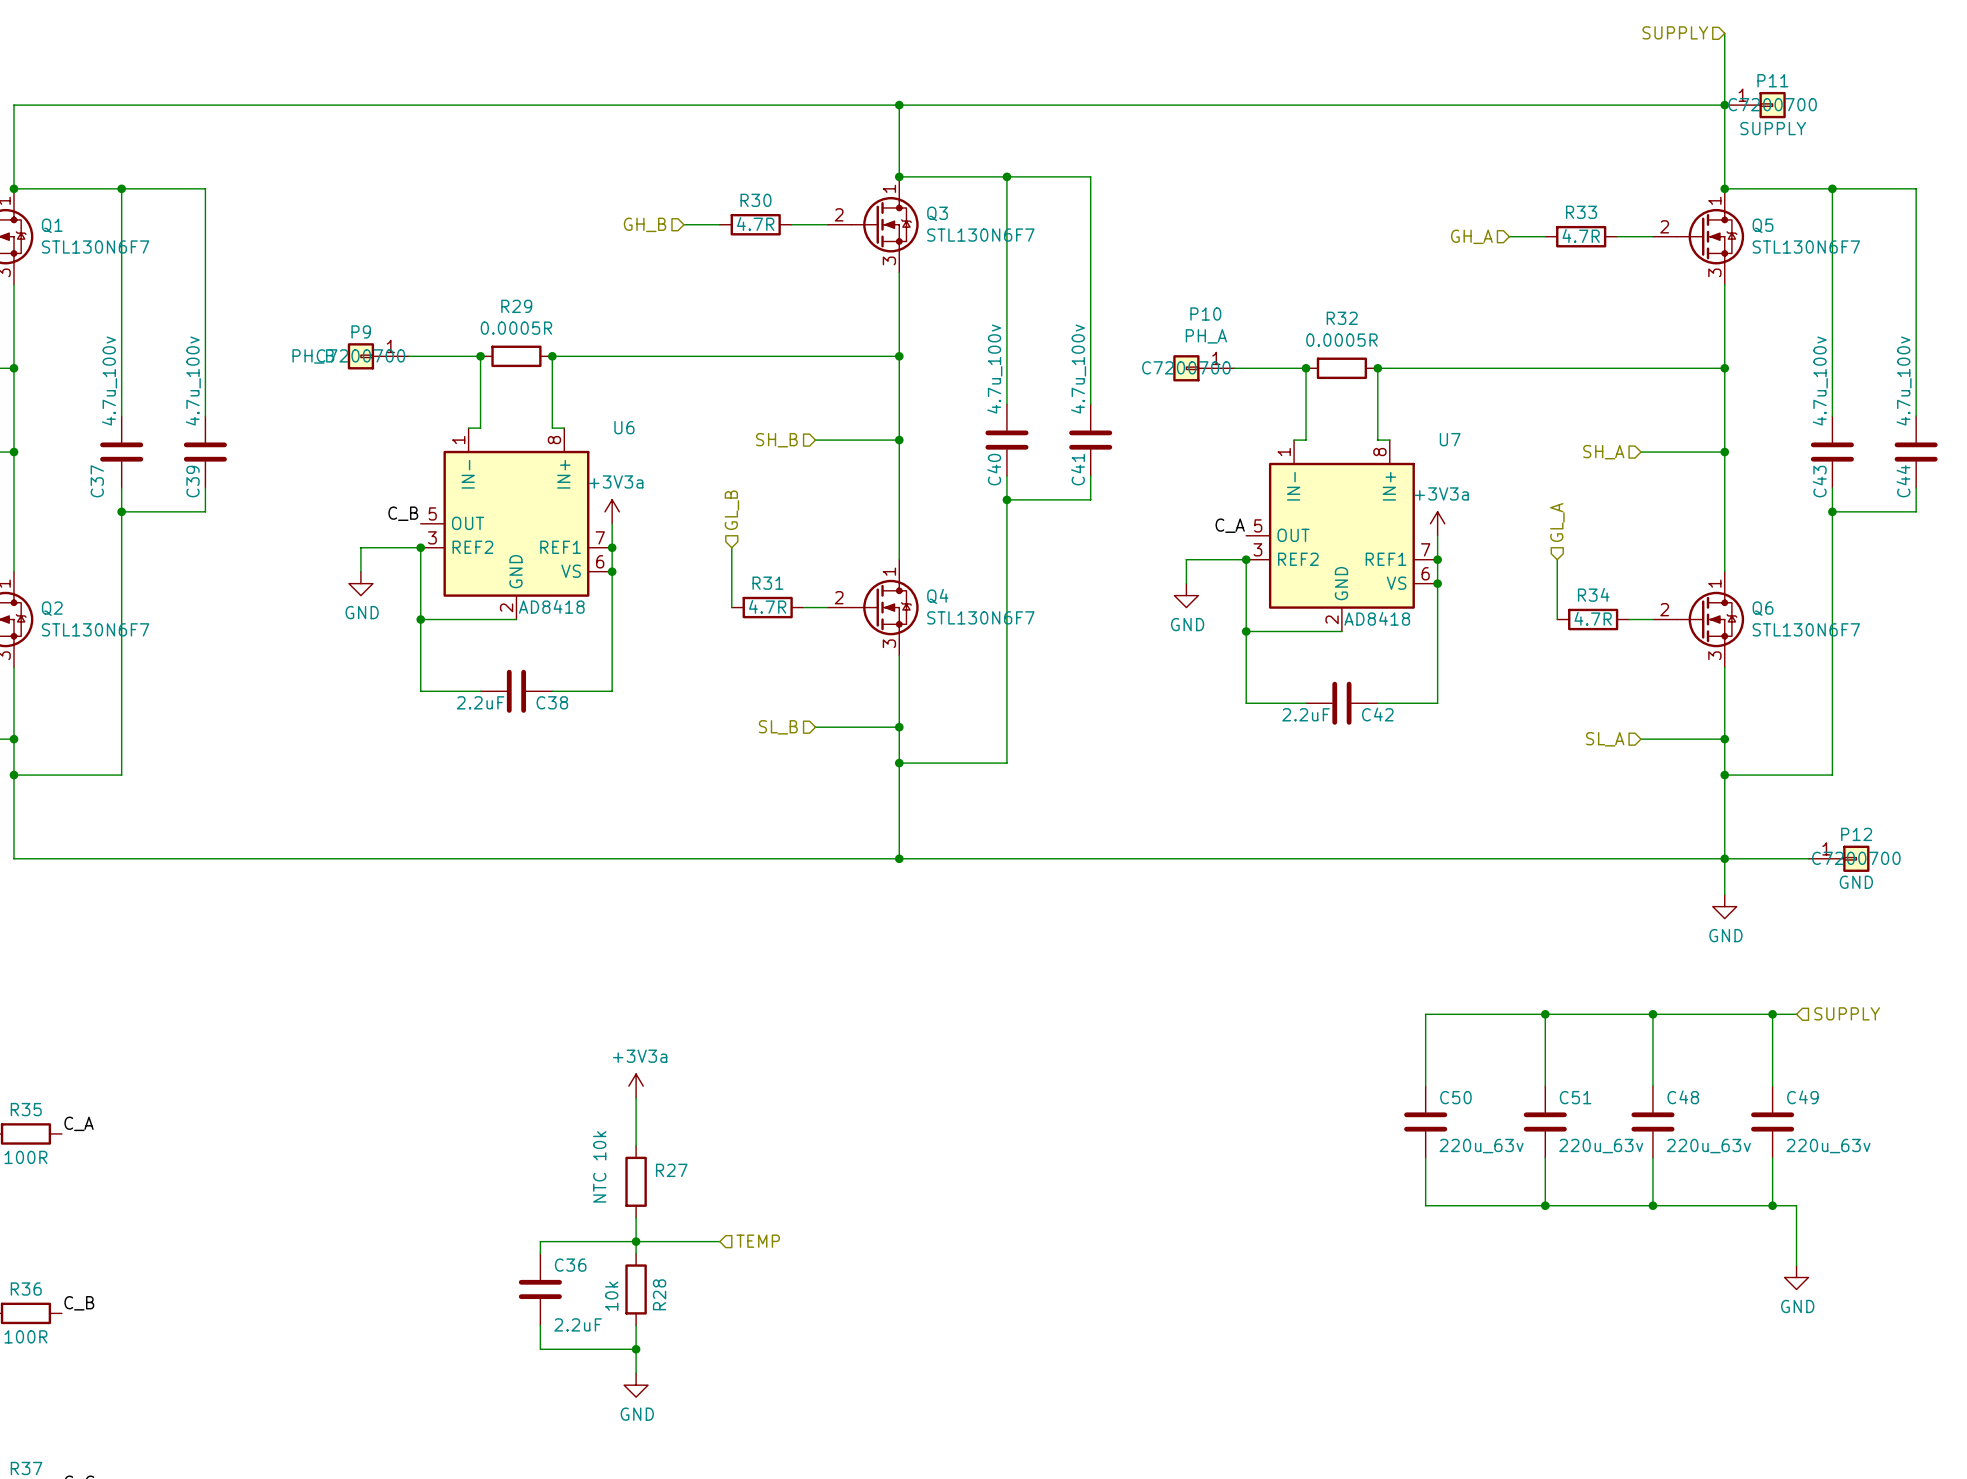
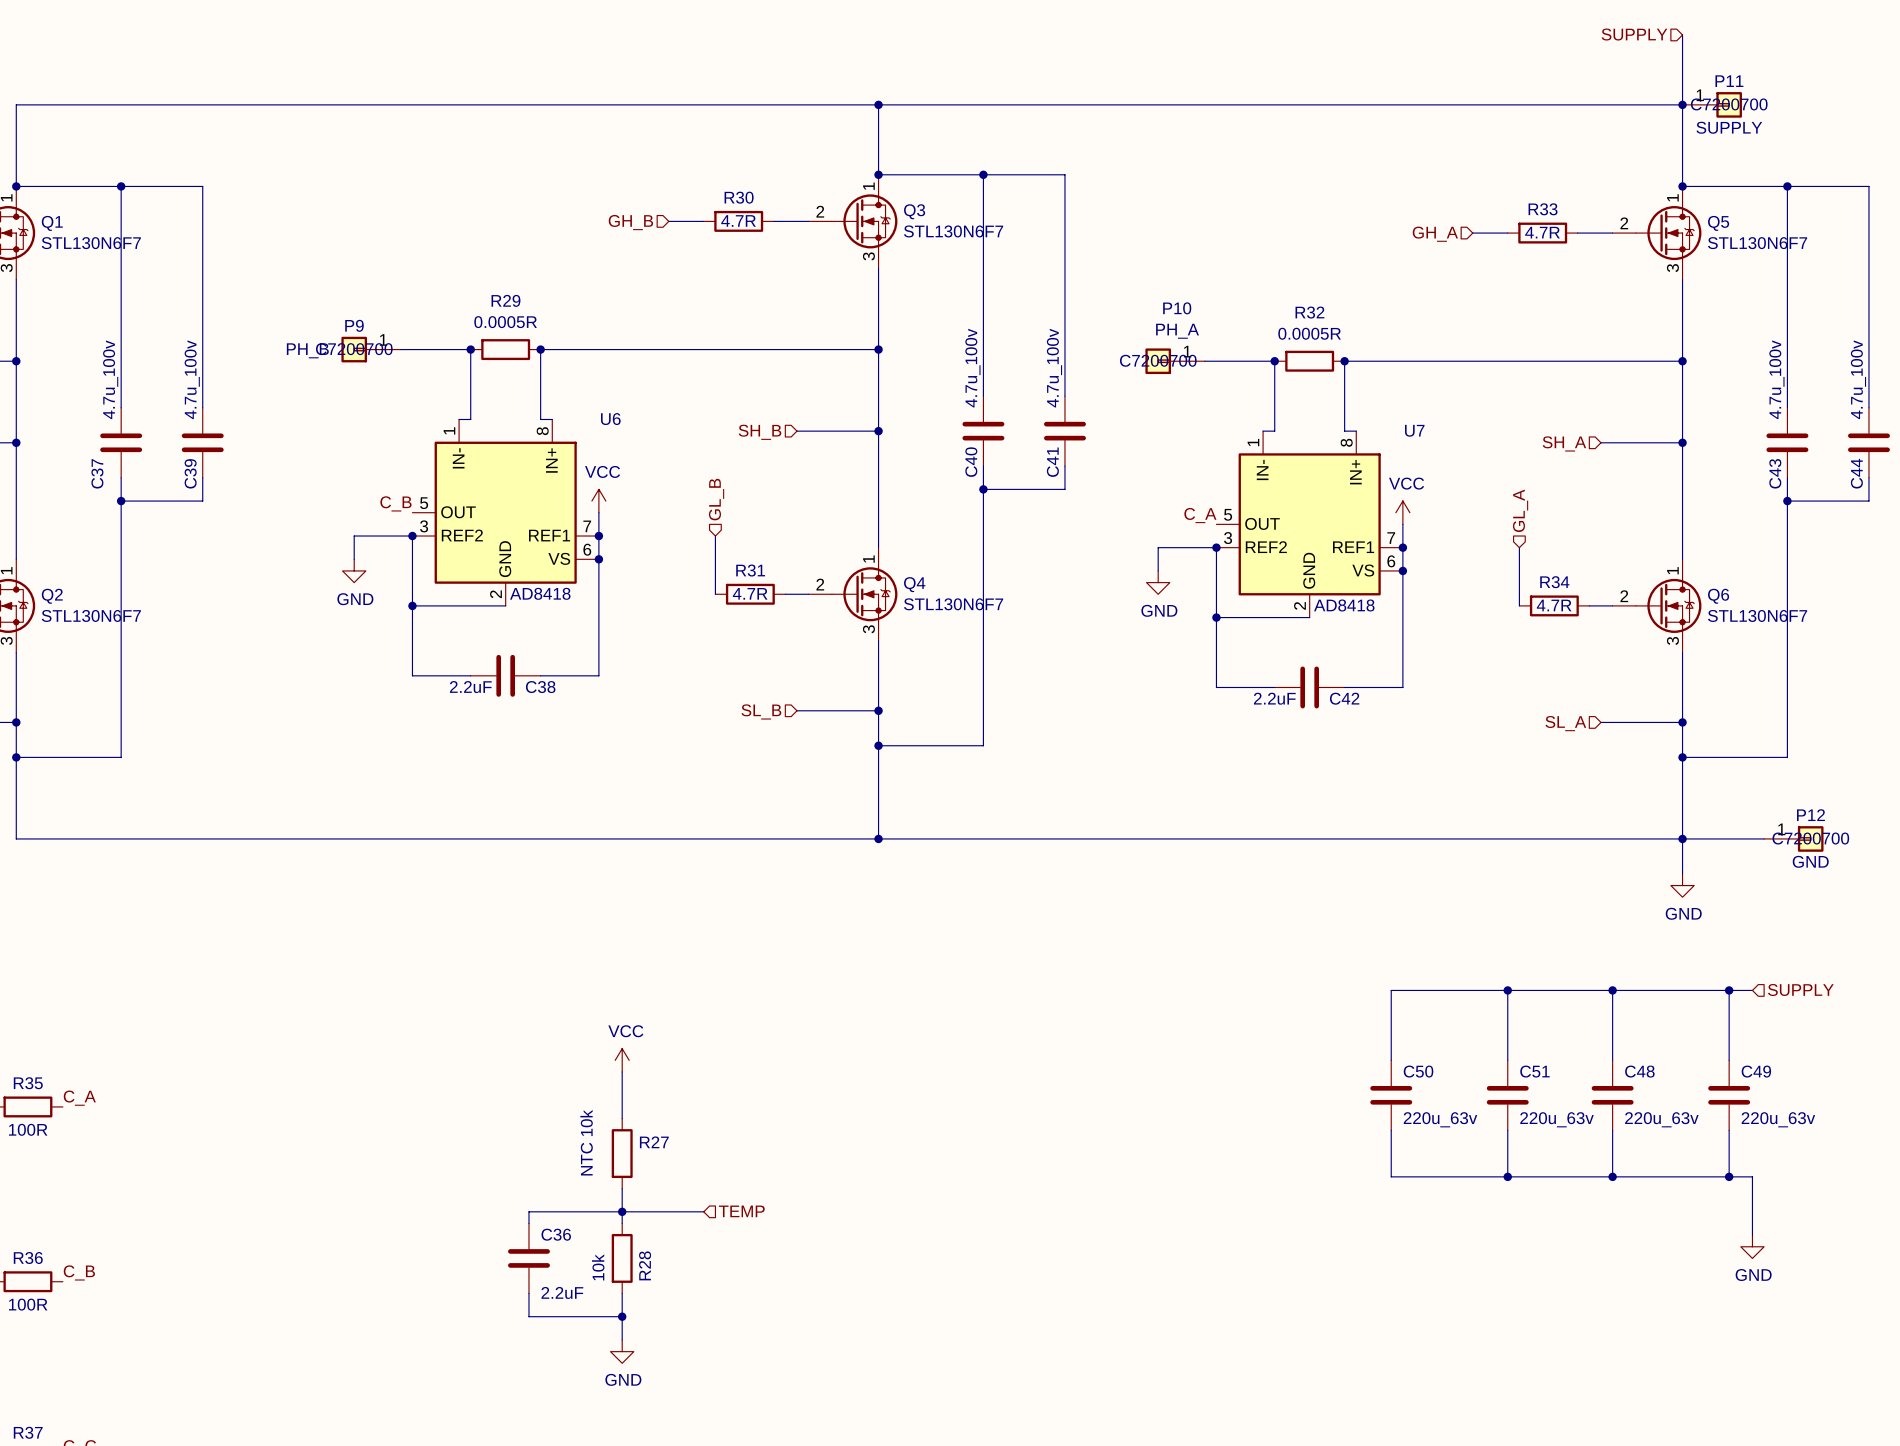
power symbol: +3V3a (612, 511) -> VCC (598, 501)
power symbol: +3V3a (1437, 523) -> VCC (1402, 512)
power symbol: +3V3a (636, 1086) -> VCC (622, 1060)

